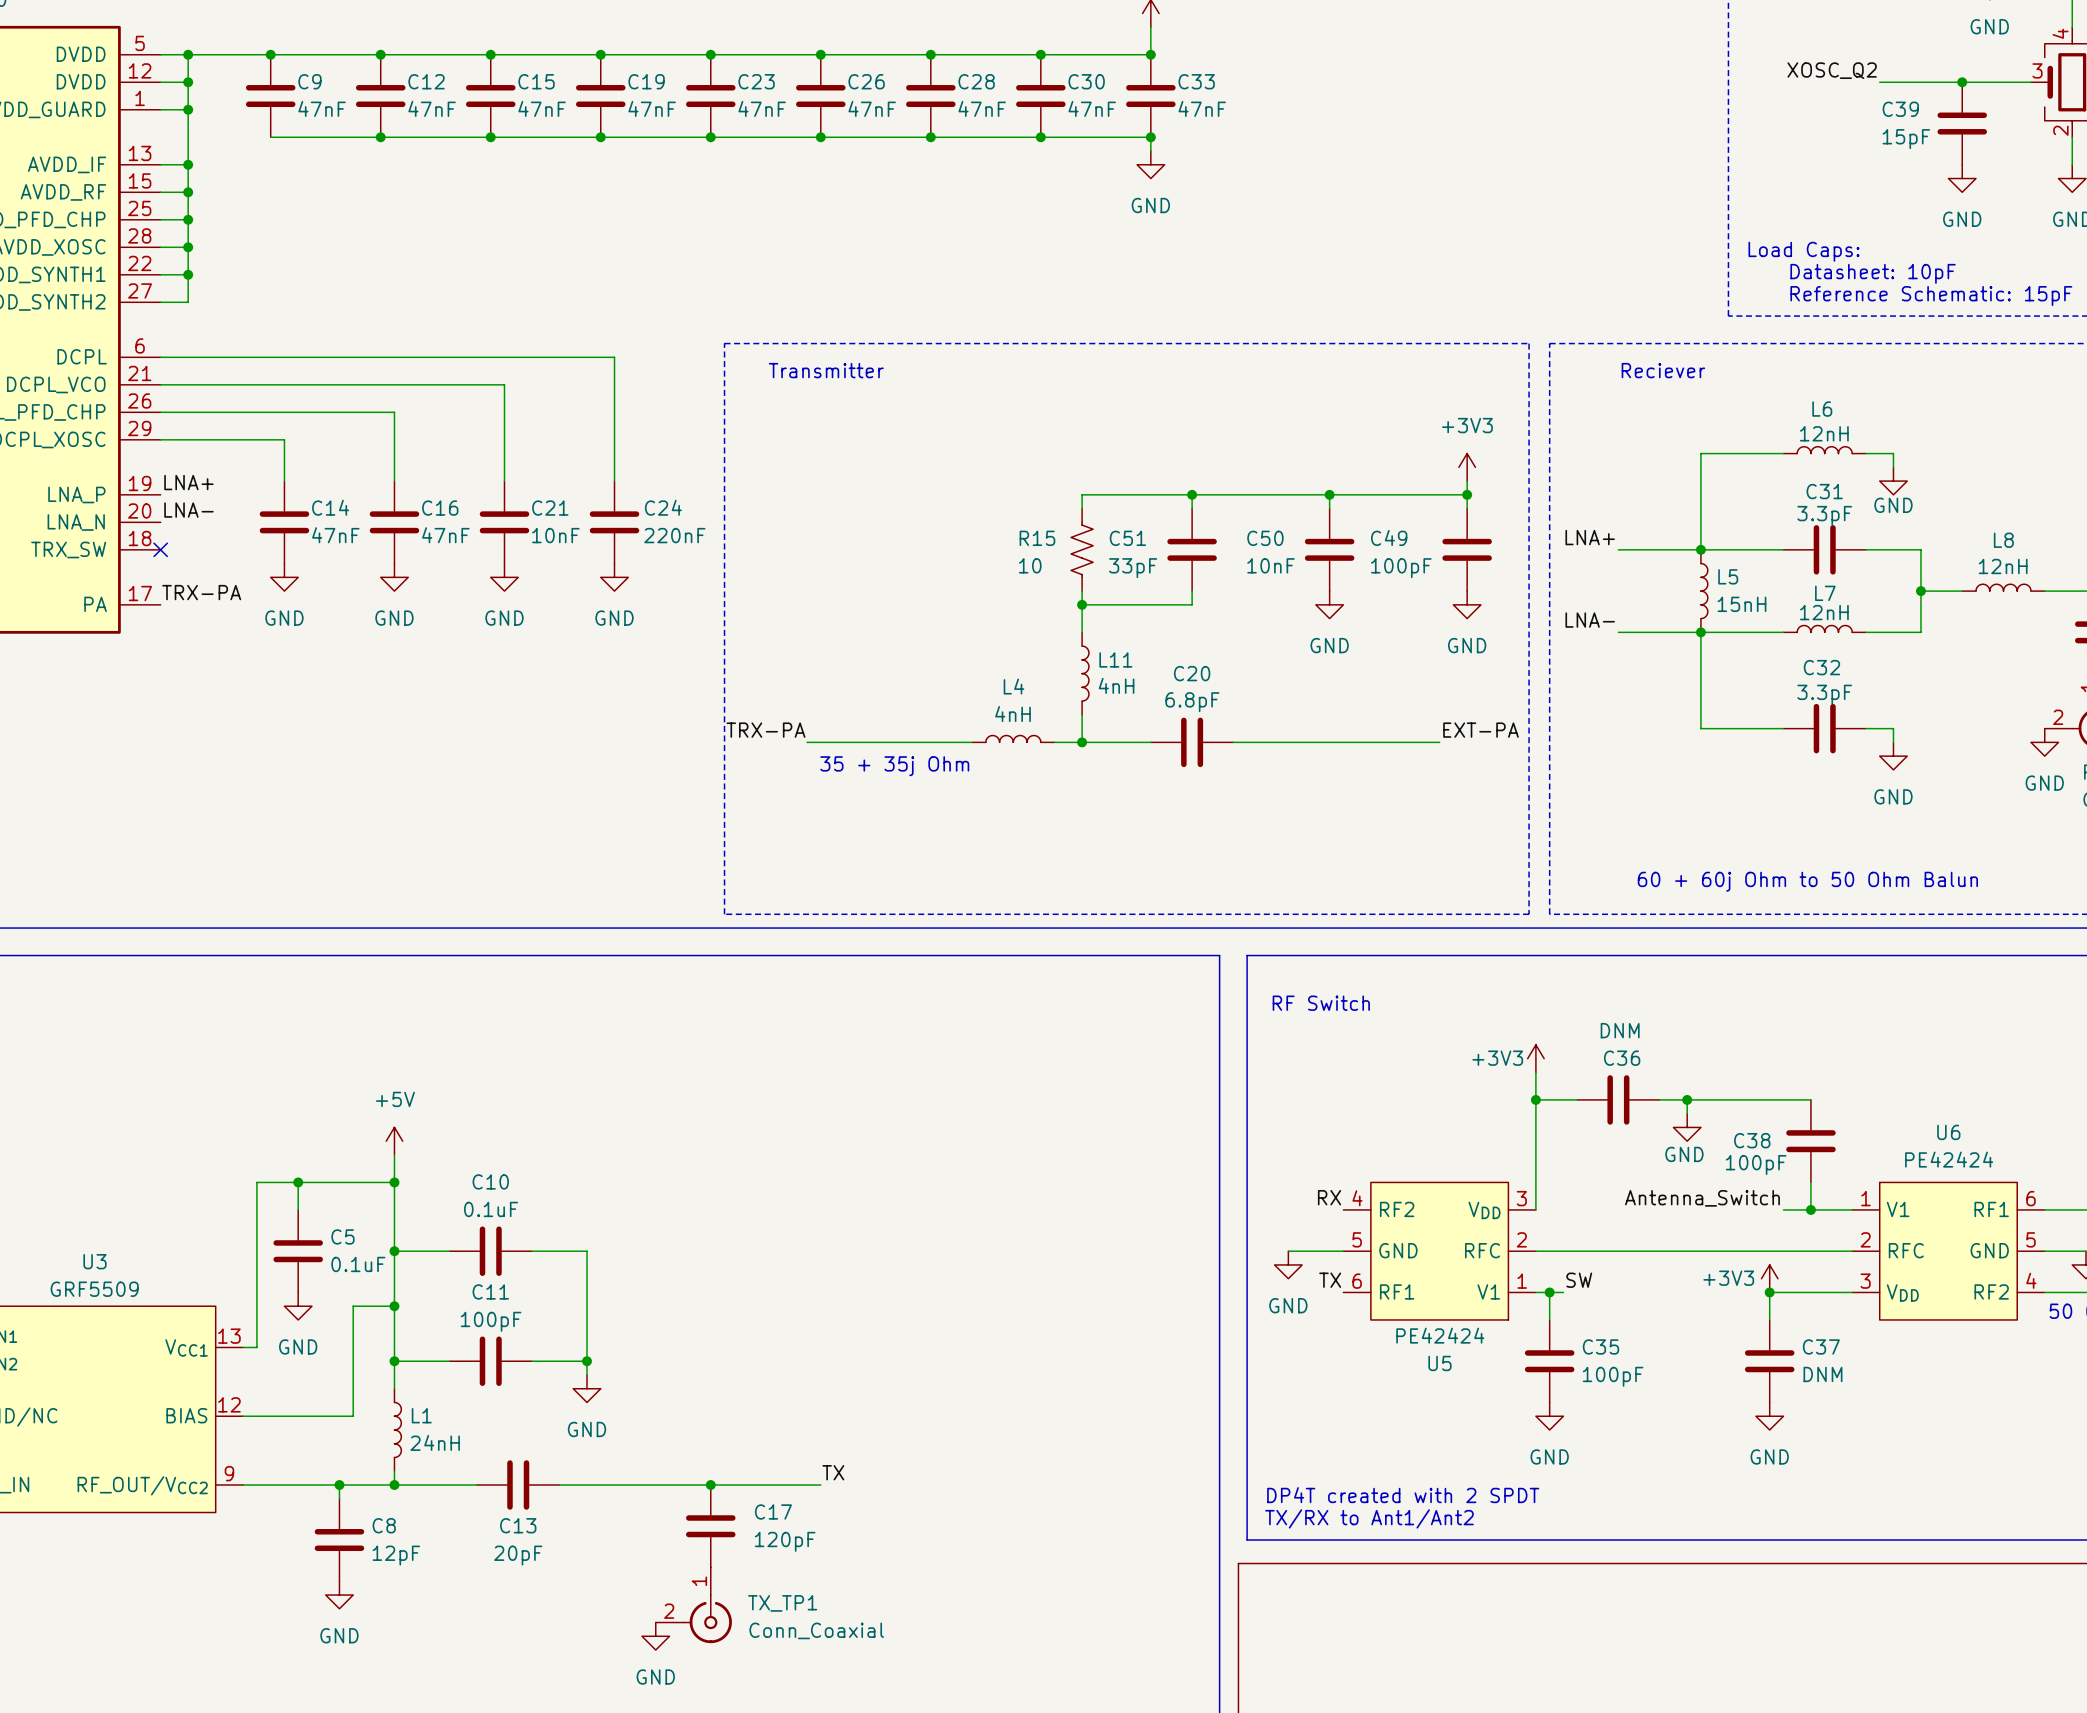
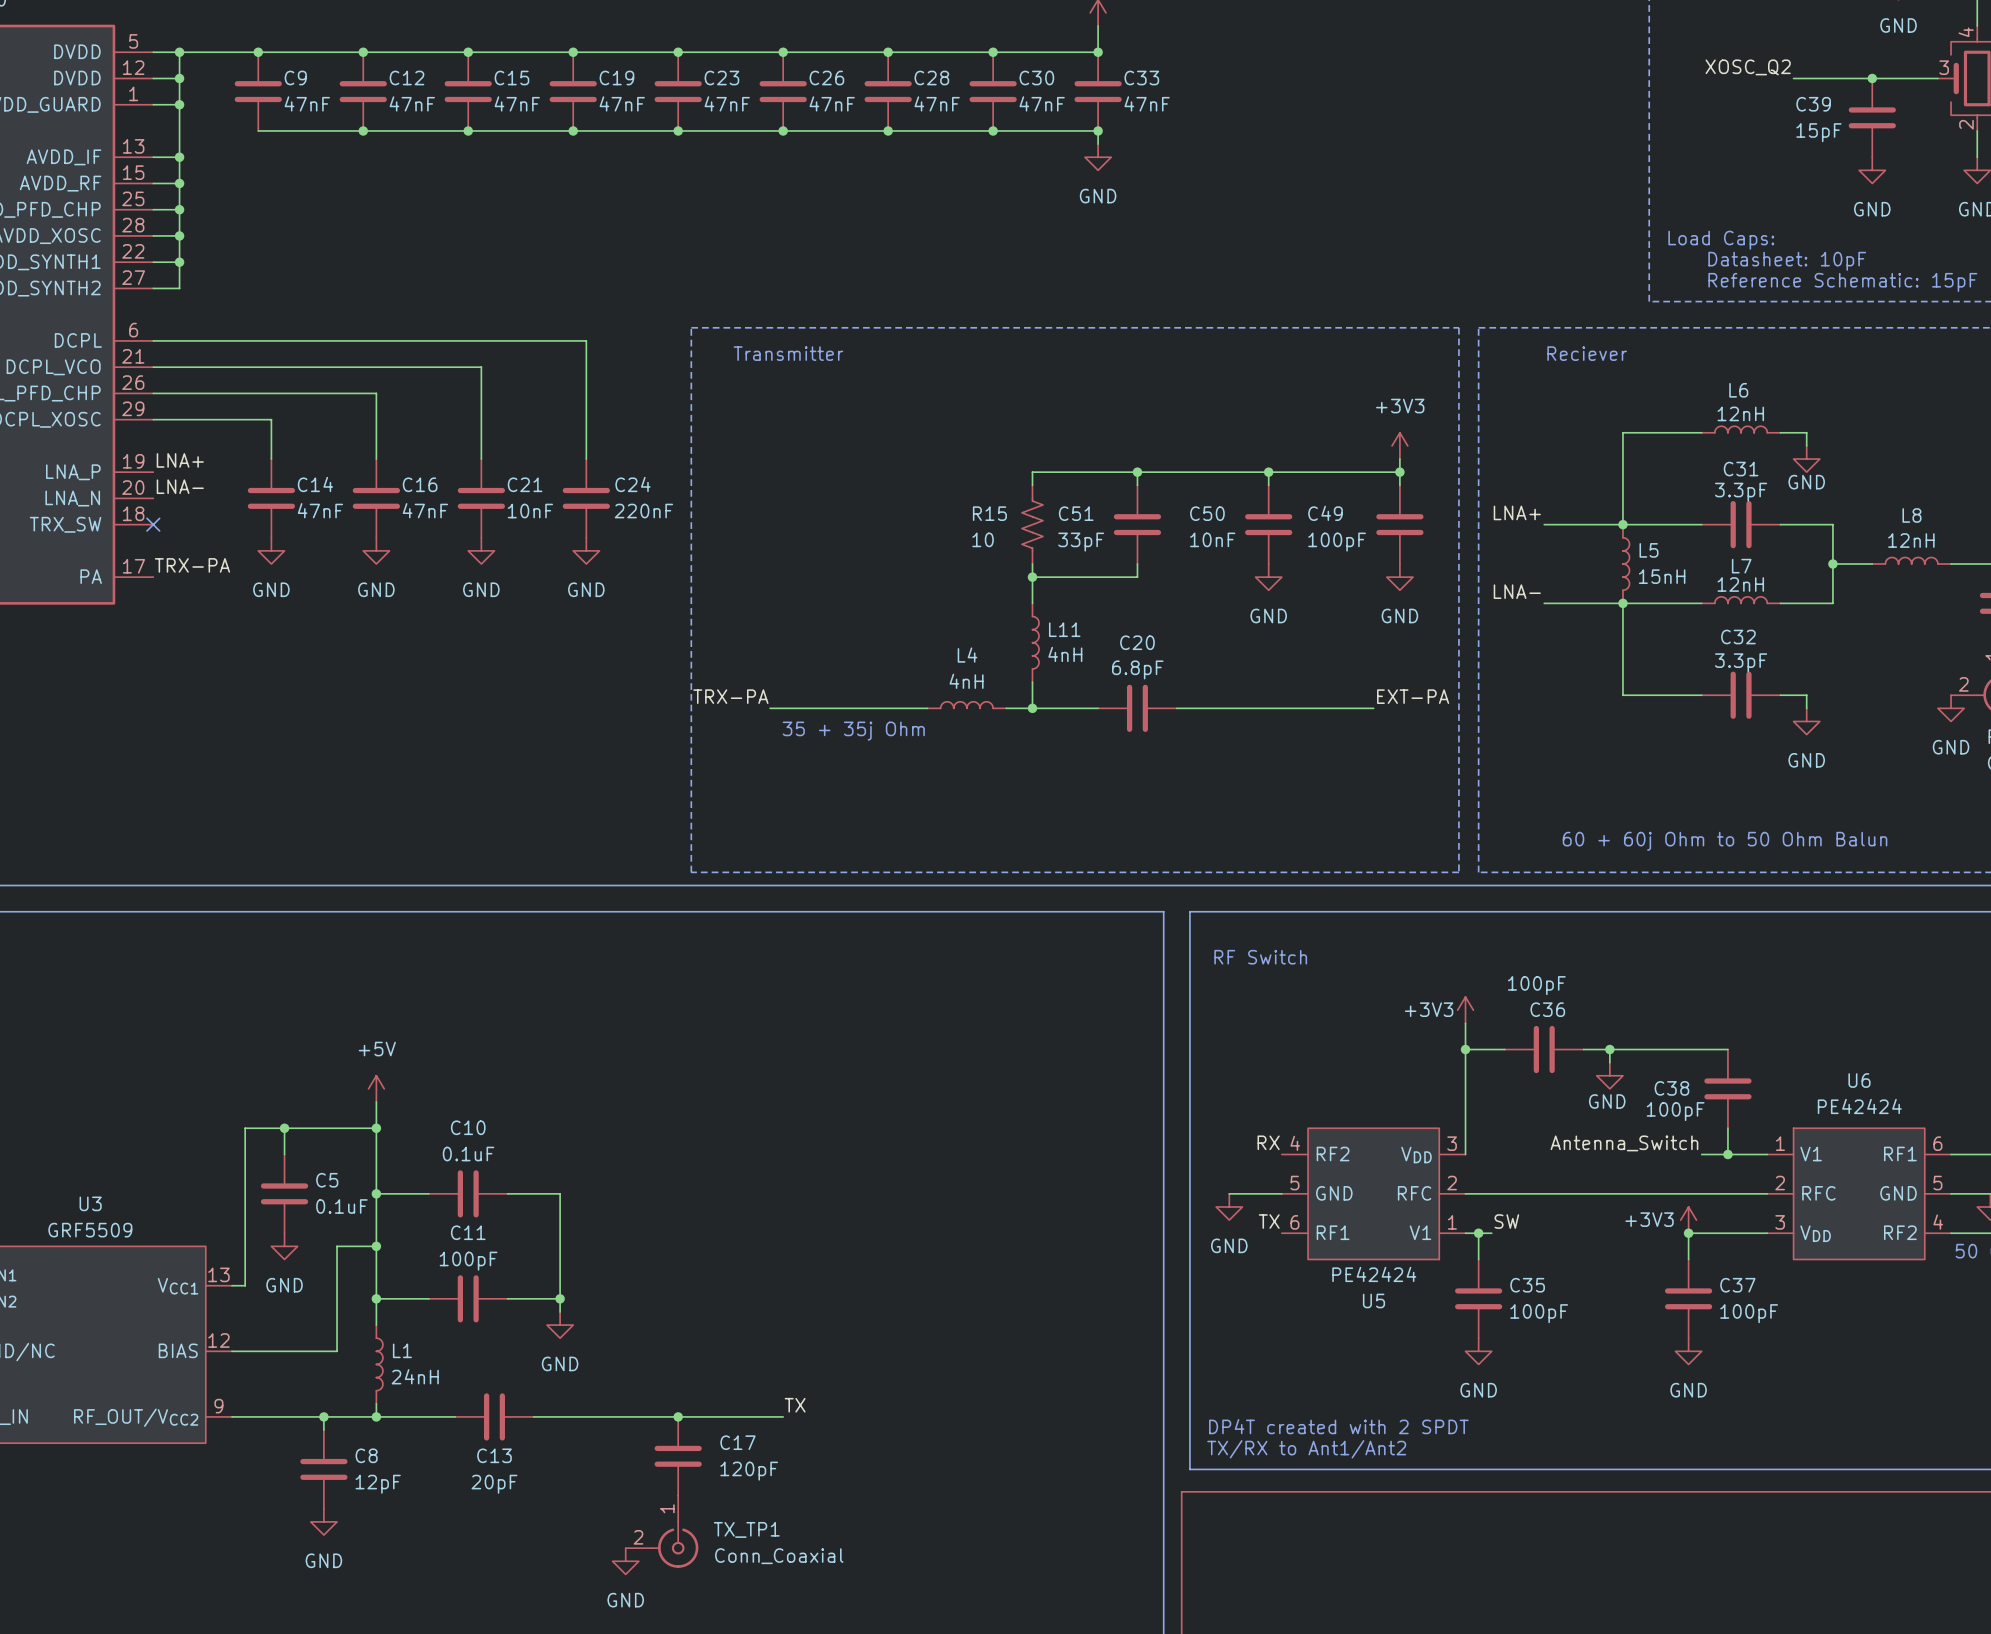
C36 value: DNM (1620, 1030) -> 100pF (1536, 985)
C37 value: DNM (1822, 1374) -> 100pF (1749, 1313)

